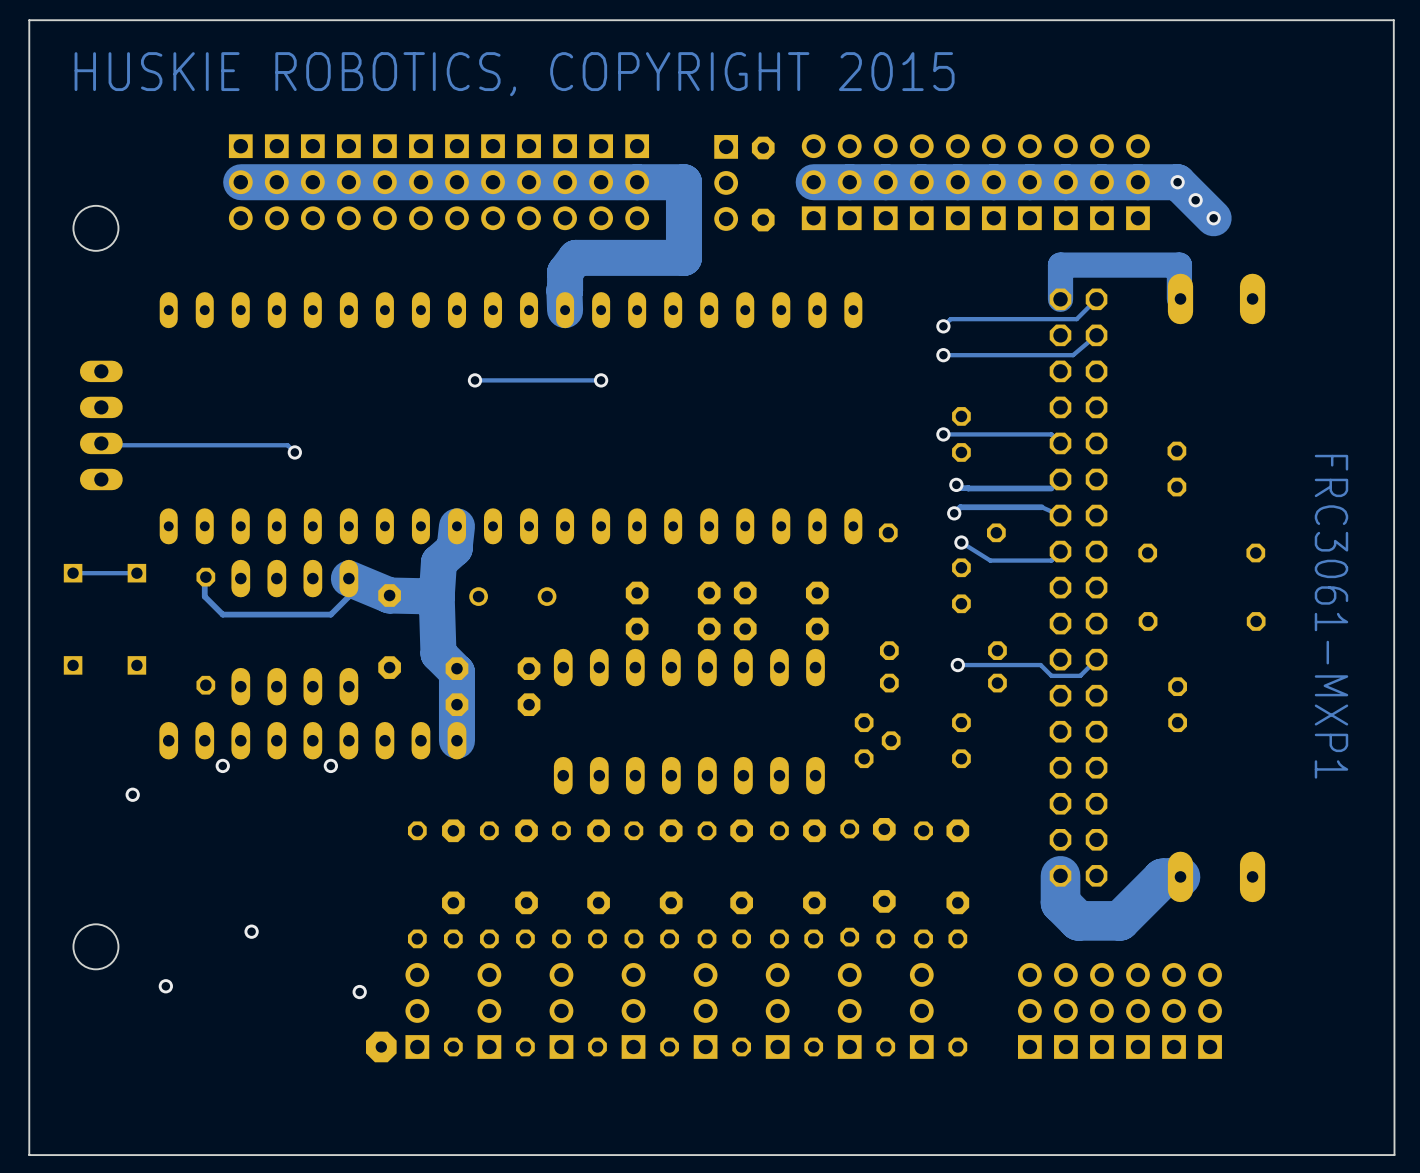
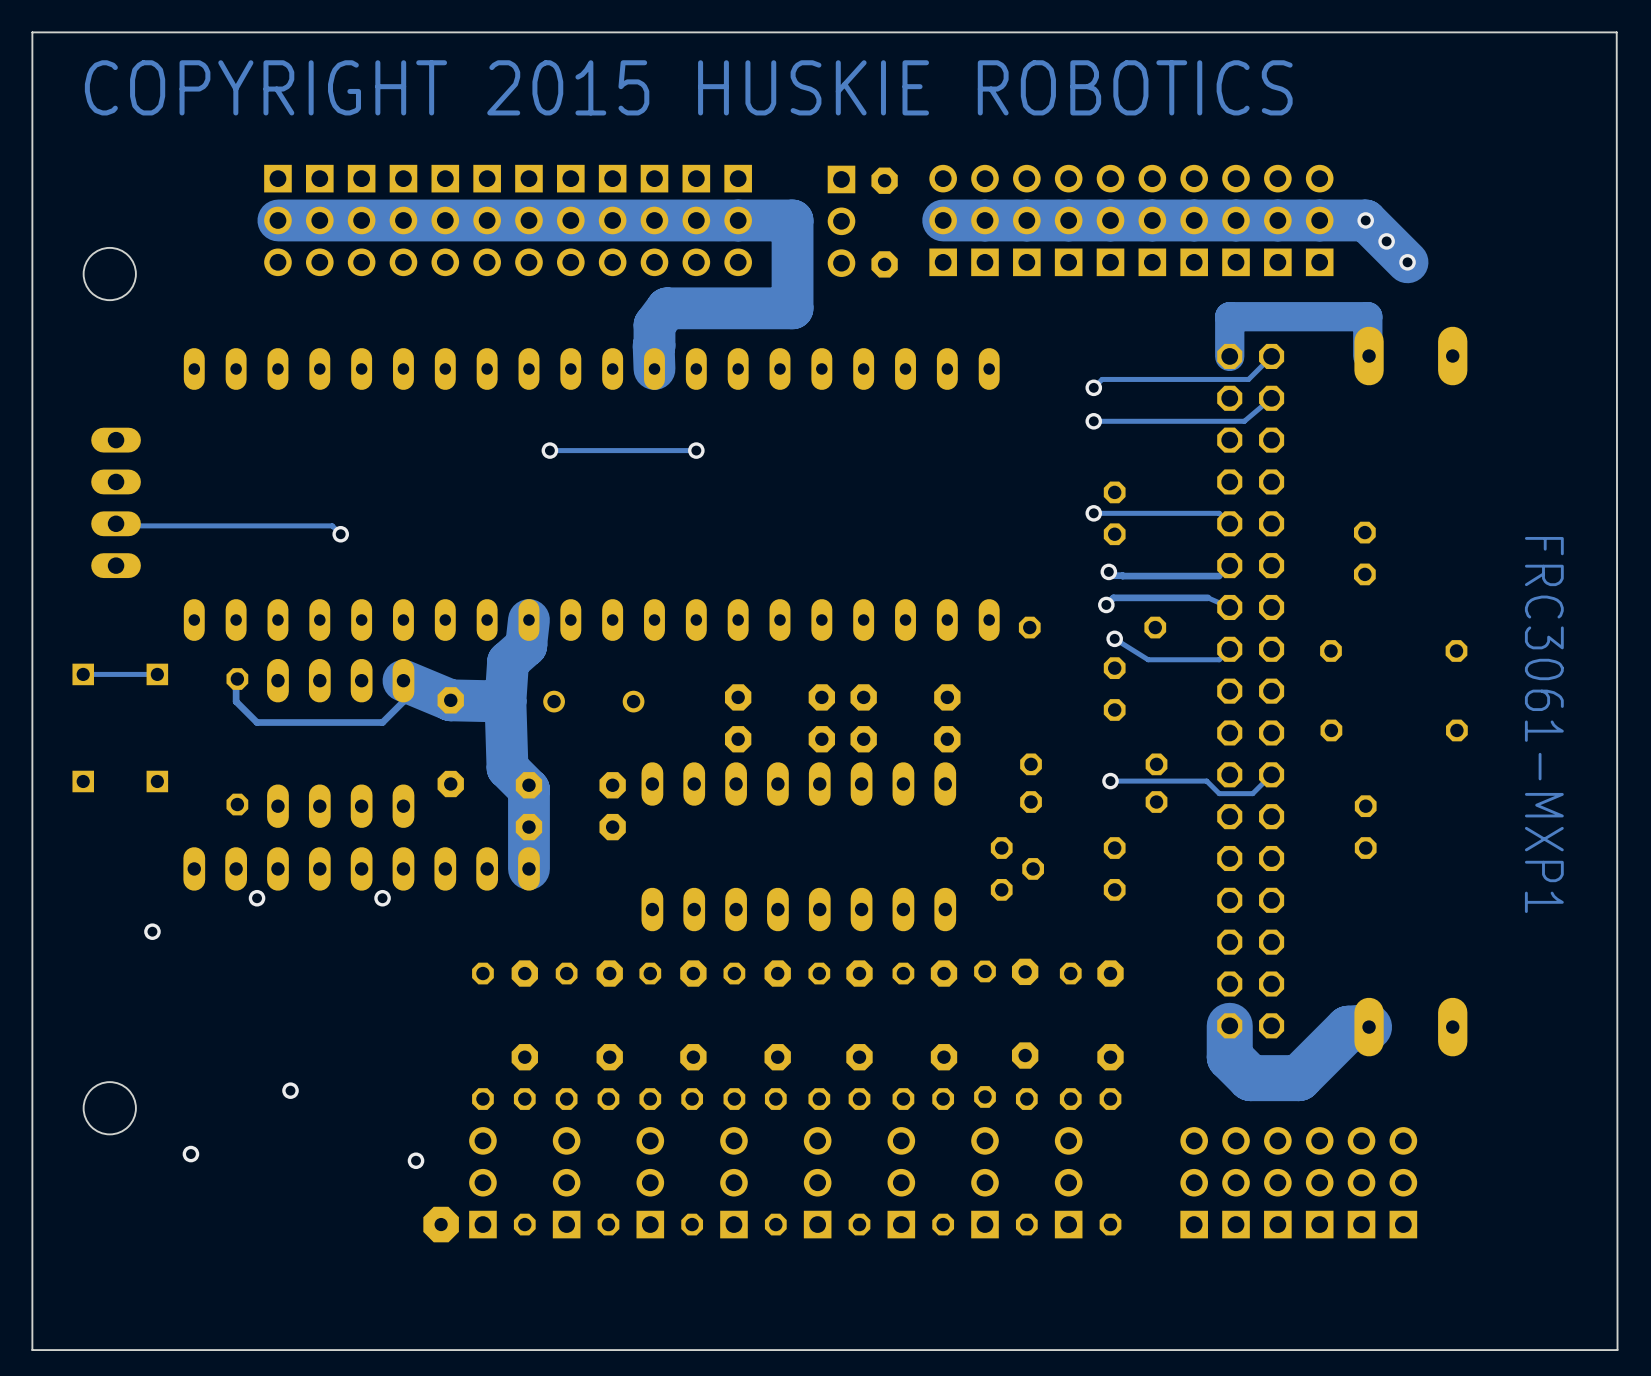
text: HUSKIE ROBOTICS, COPYRIGHT 2015 (514, 74) -> COPYRIGHT 2015 HUSKIE ROBOTICS (688, 87)

